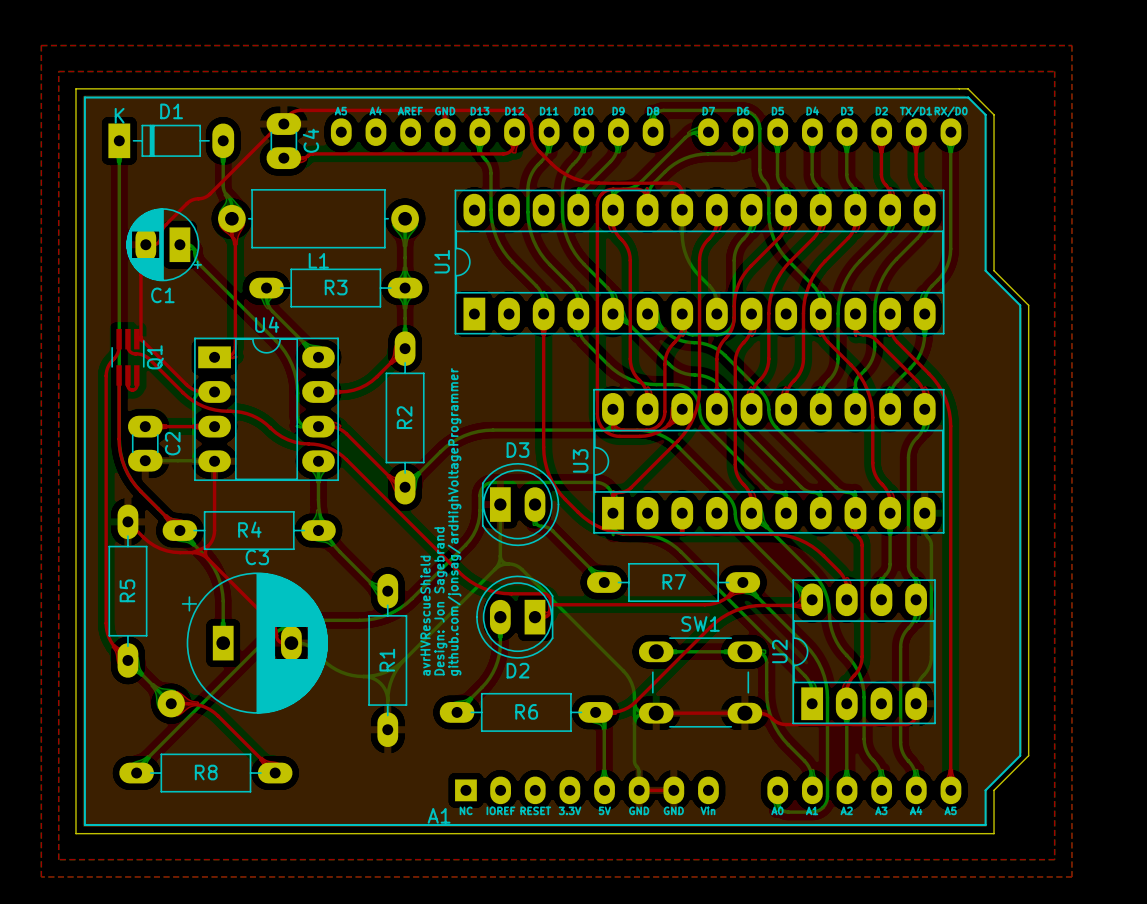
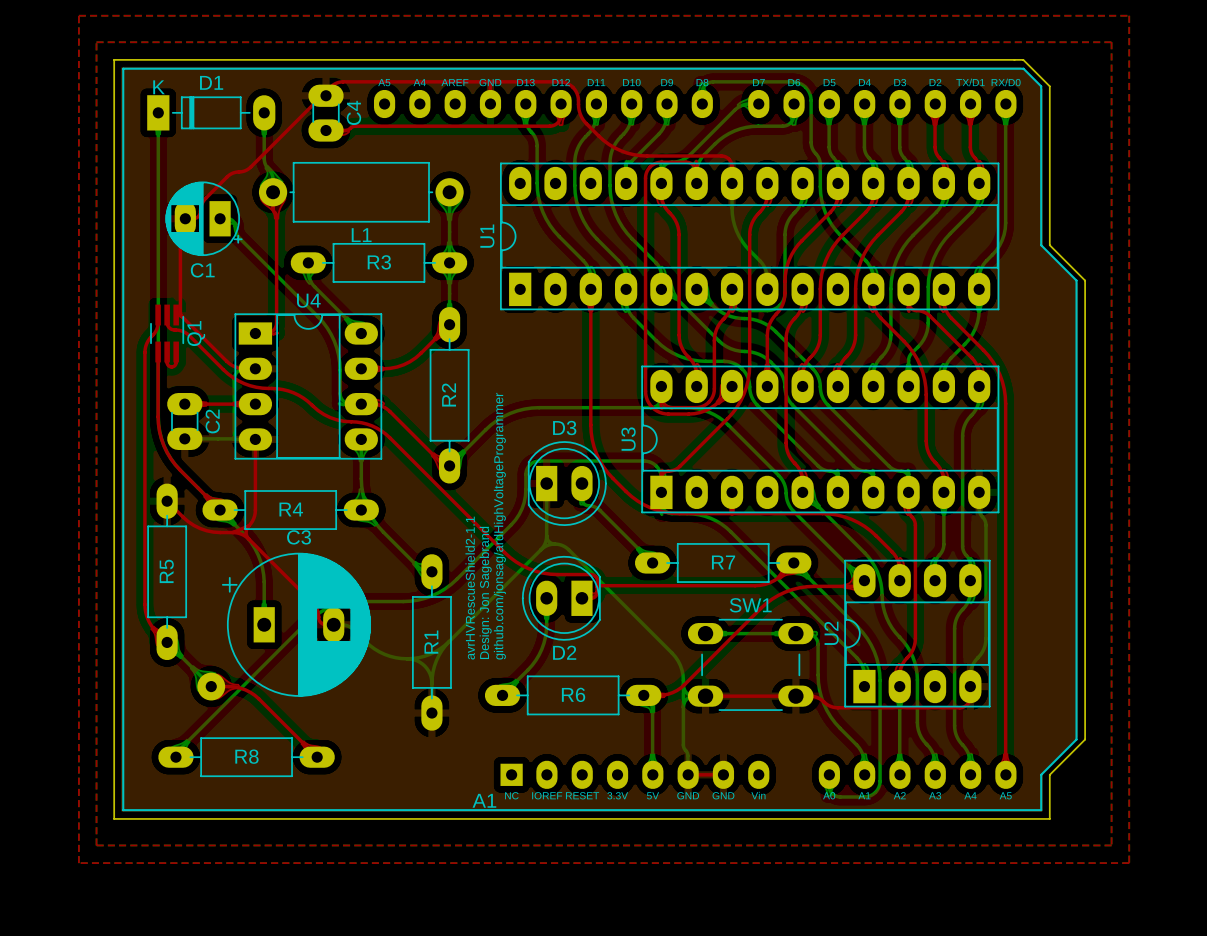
text: avrHVRescueShield (425, 615) -> avrHVRescueShield2-1.1 (470, 588)

